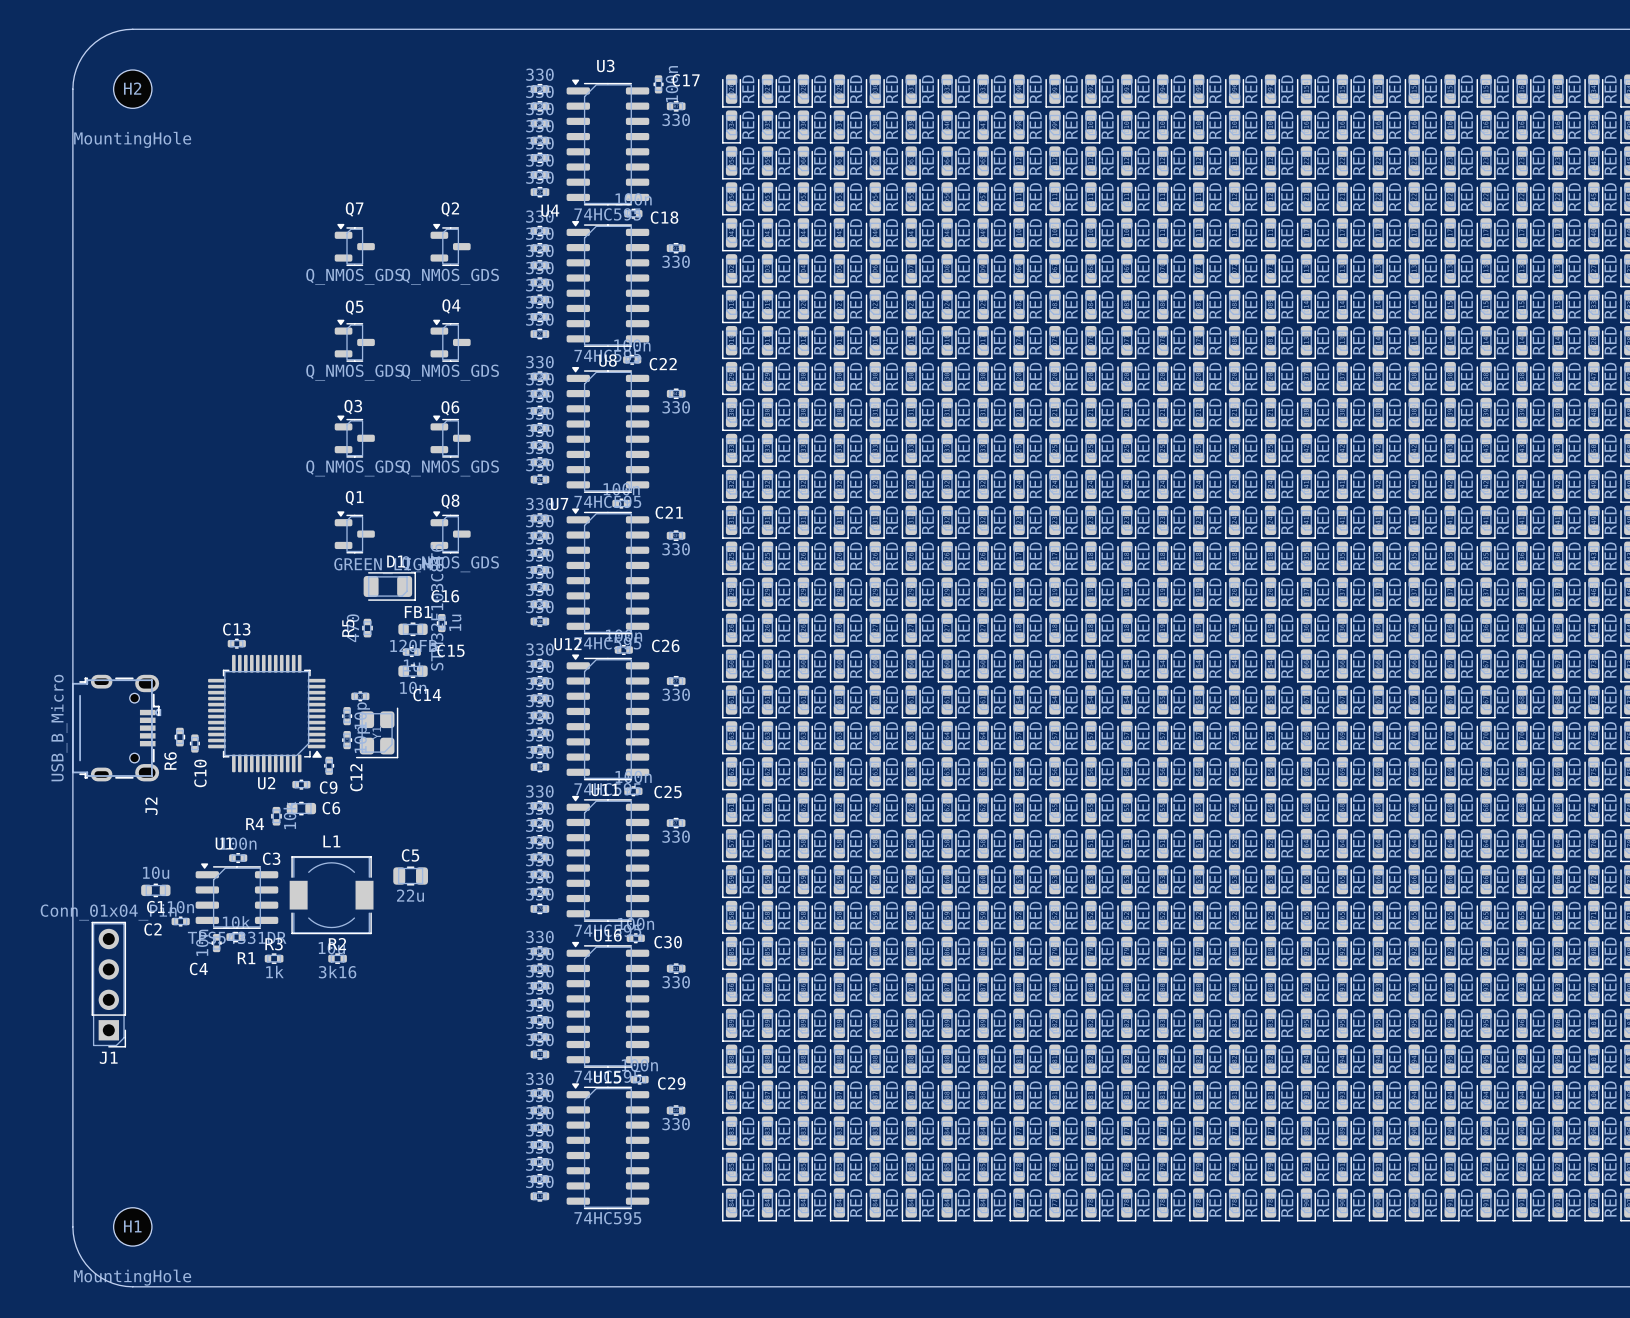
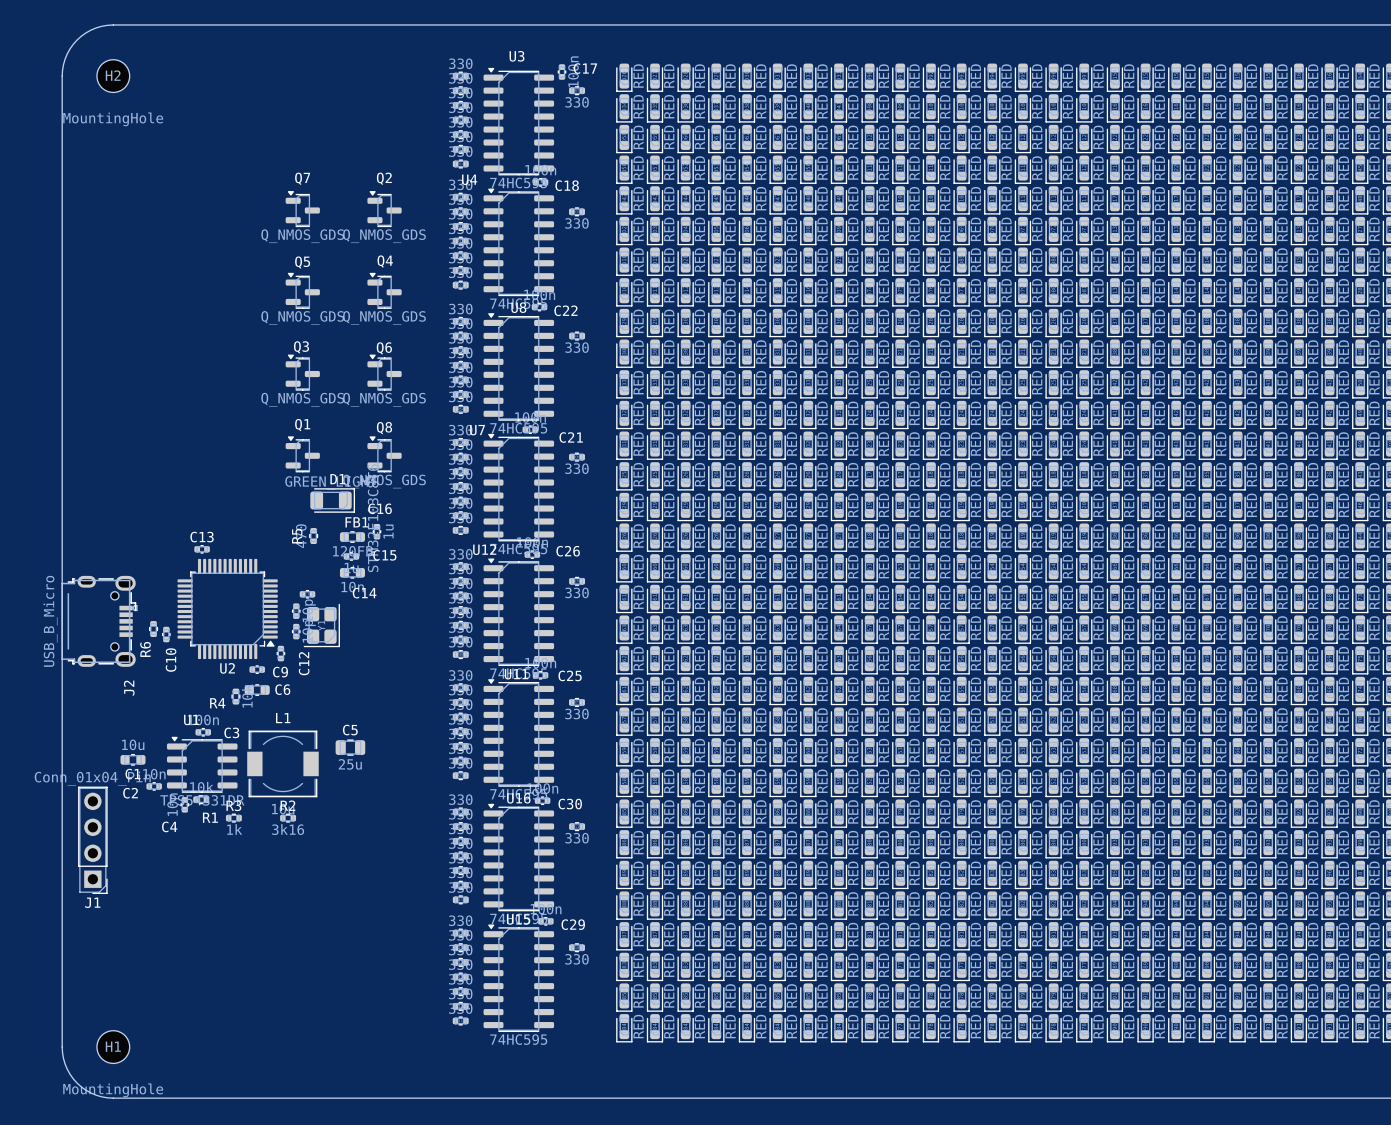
C5 value: 22u (410, 895) -> 25u (350, 764)

